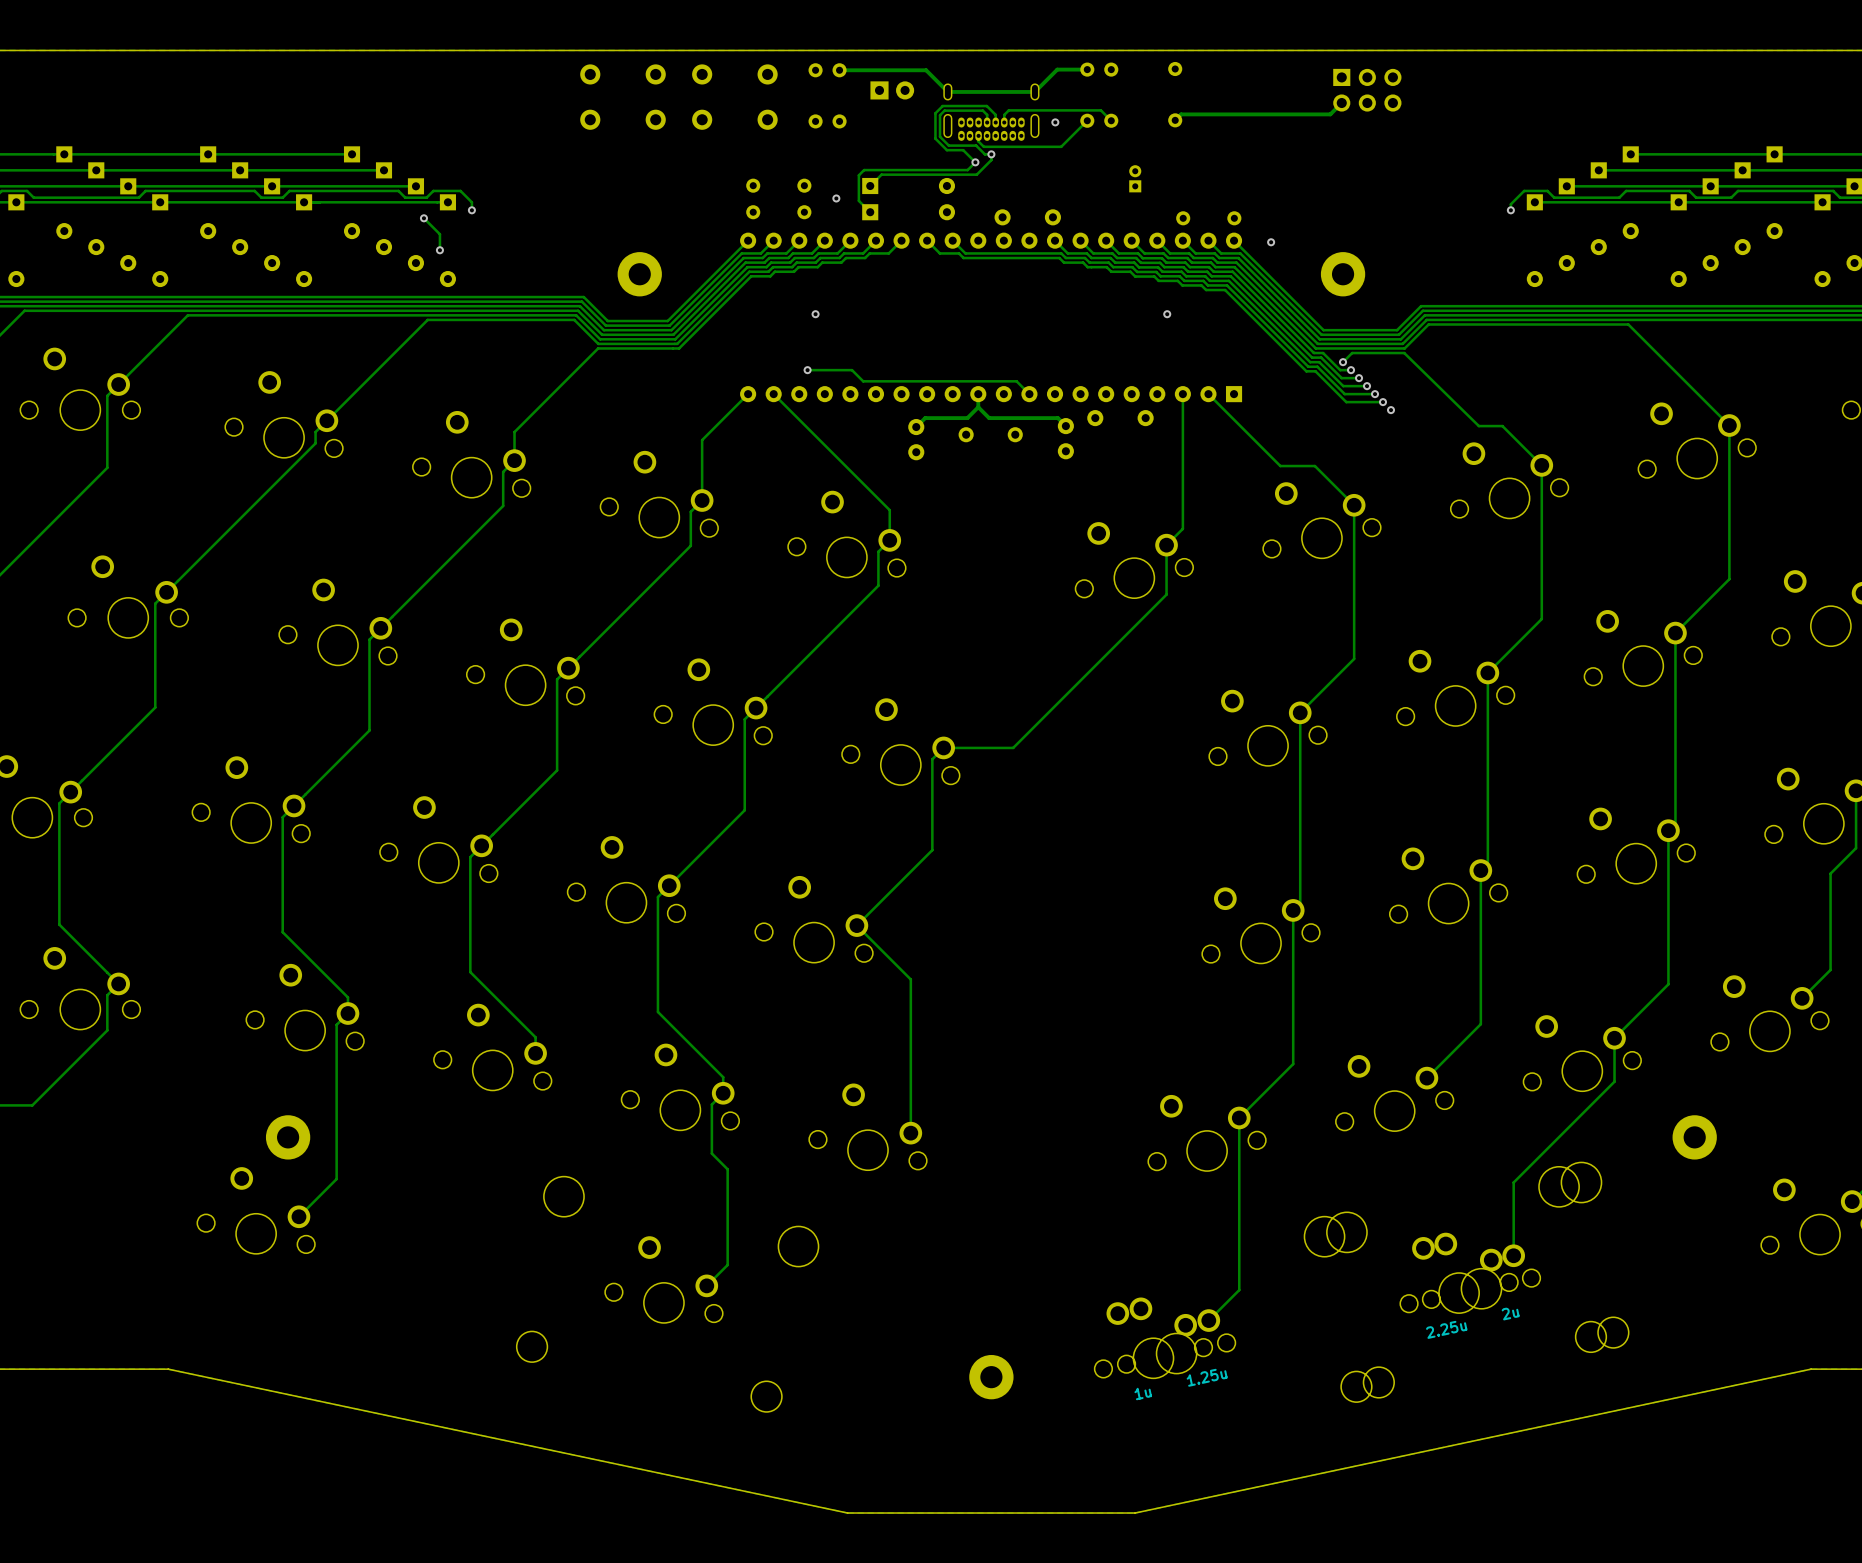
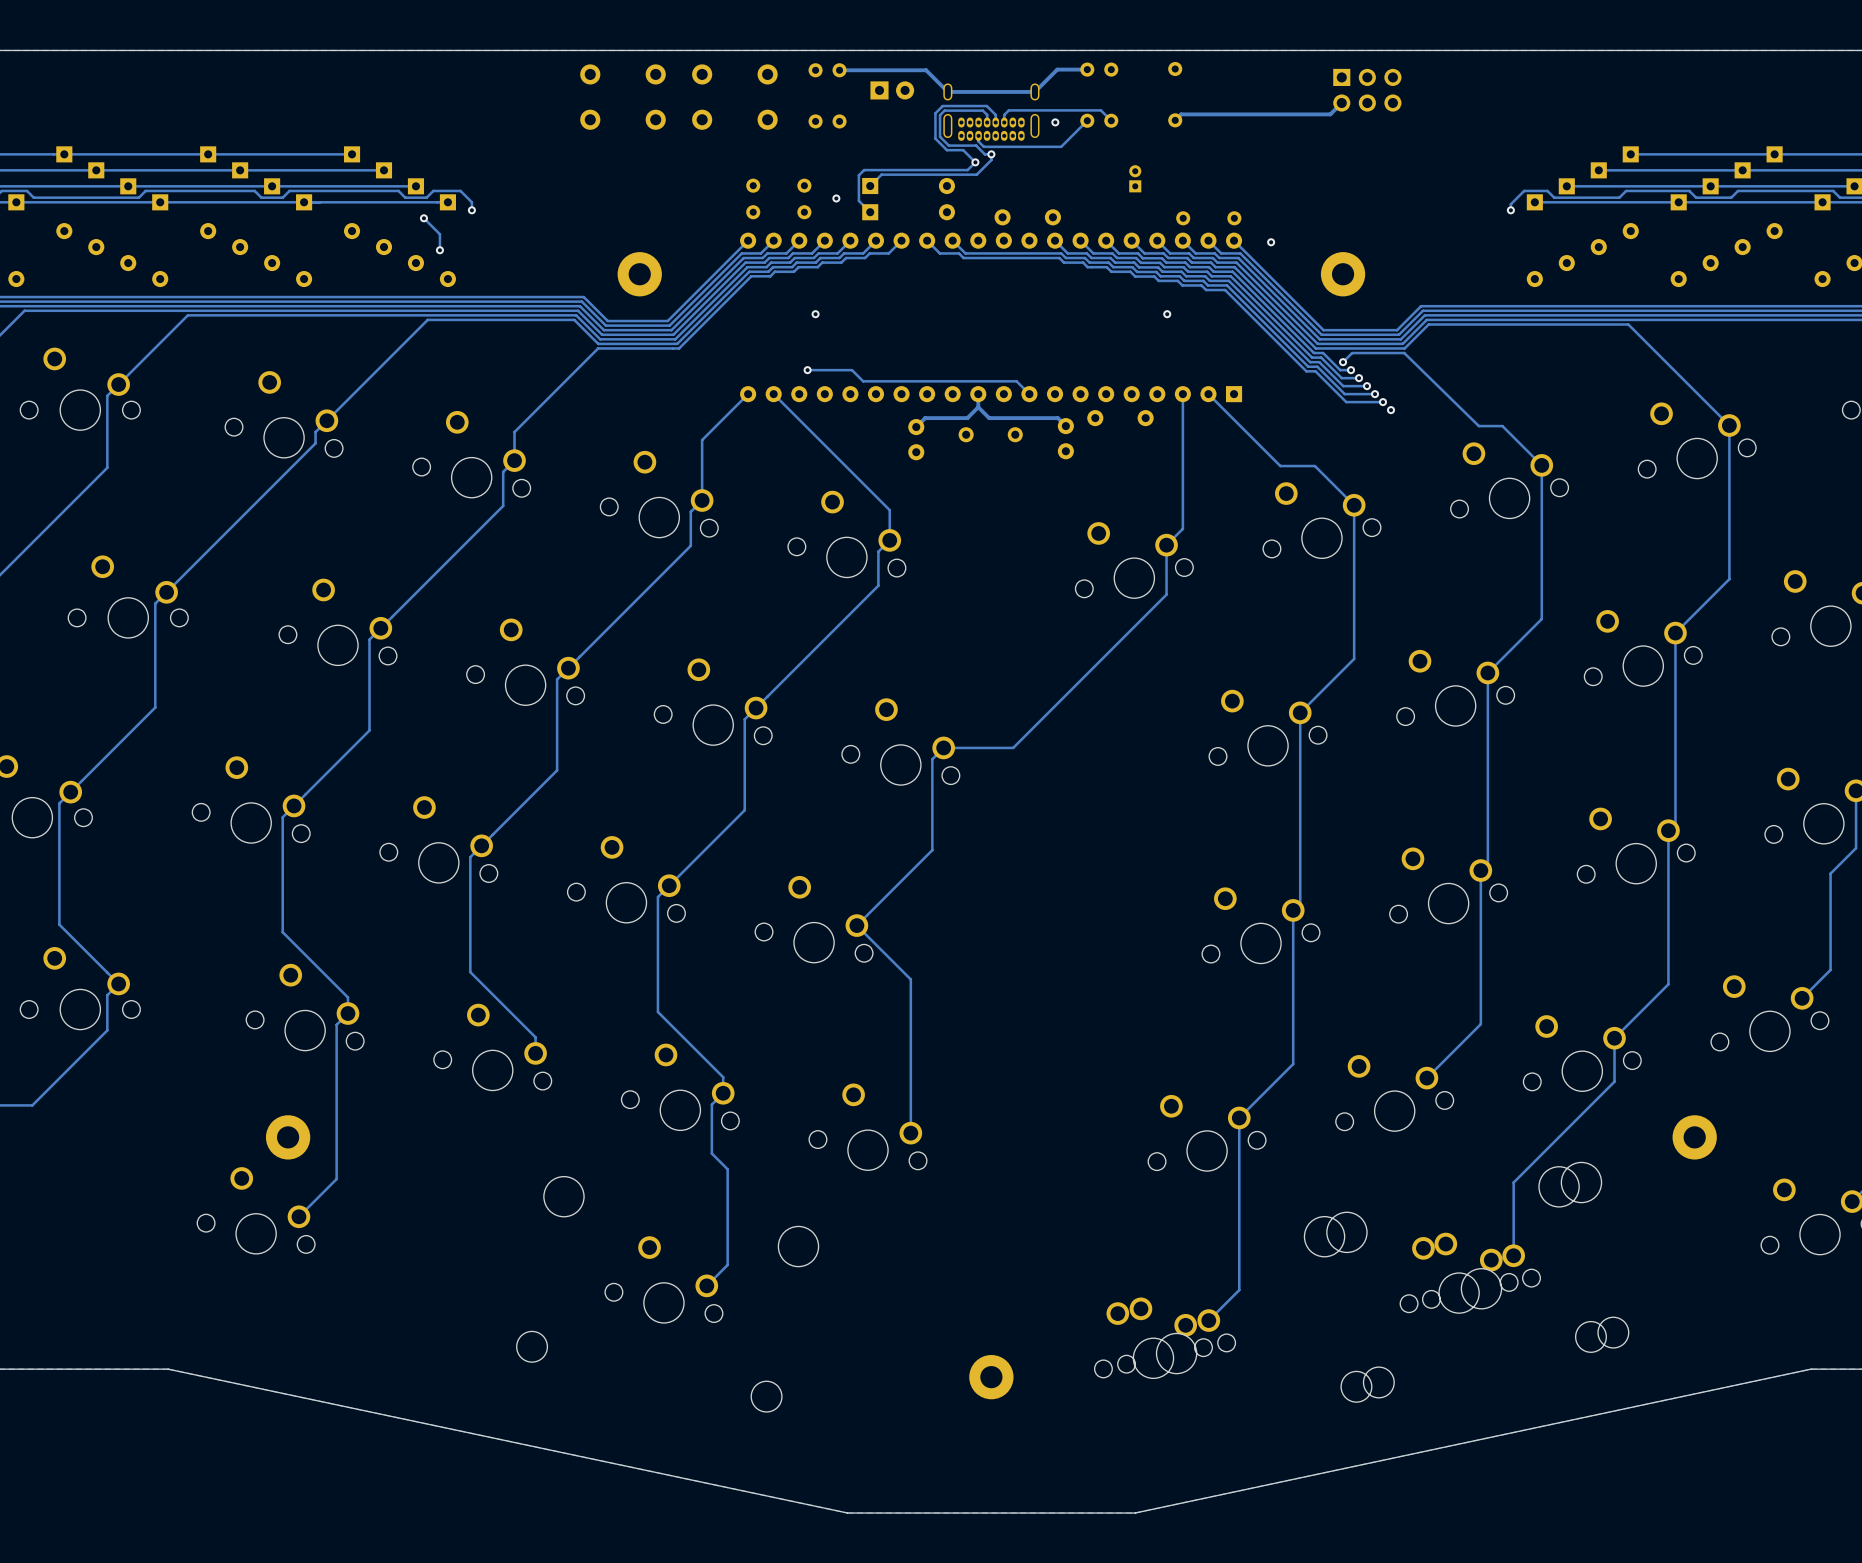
text: 2u (1510, 1314) -> none
text: 2.25u (1446, 1329) -> none
text: 1.25u (1207, 1377) -> none
text: 1u (1143, 1394) -> none

